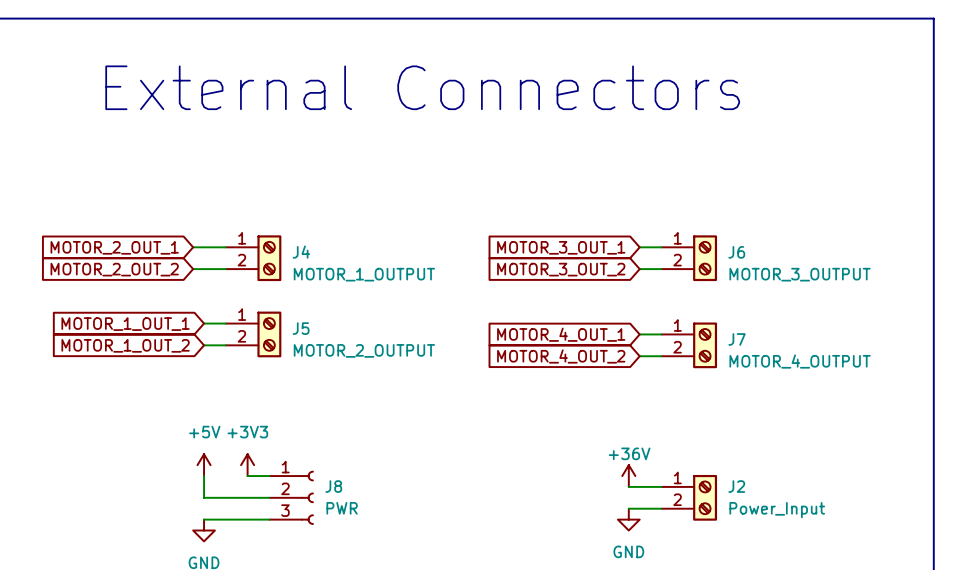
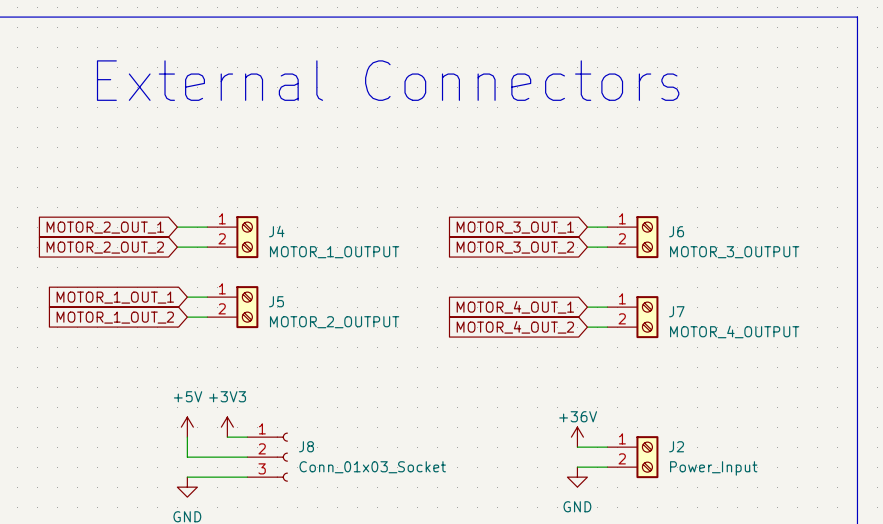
J8 value: PWR (342, 508) -> Conn_01x03_Socket (372, 467)

